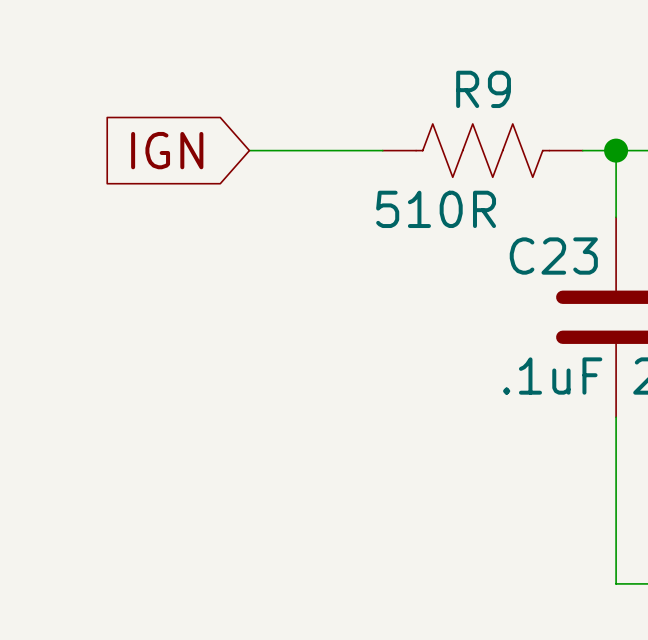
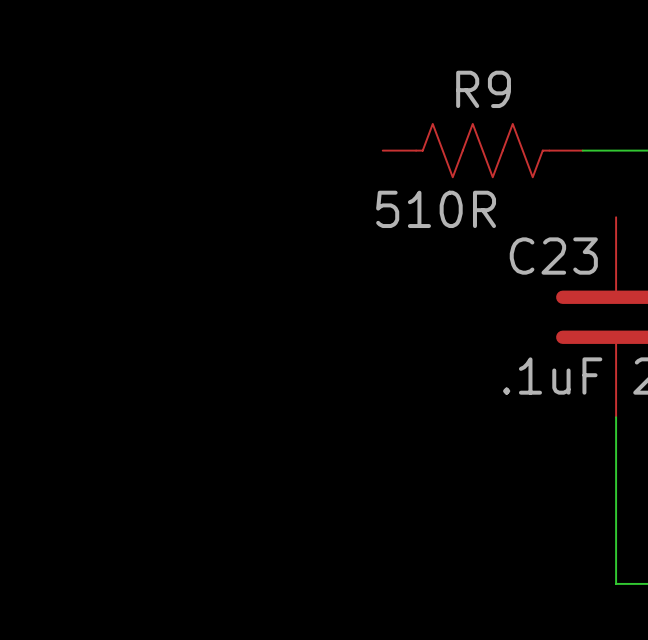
global label: IGN (167, 150) -> none
wire: (249, 150) (382, 150) -> none
wire: (616, 150) (616, 217) -> none
junction: (616, 150) -> none

